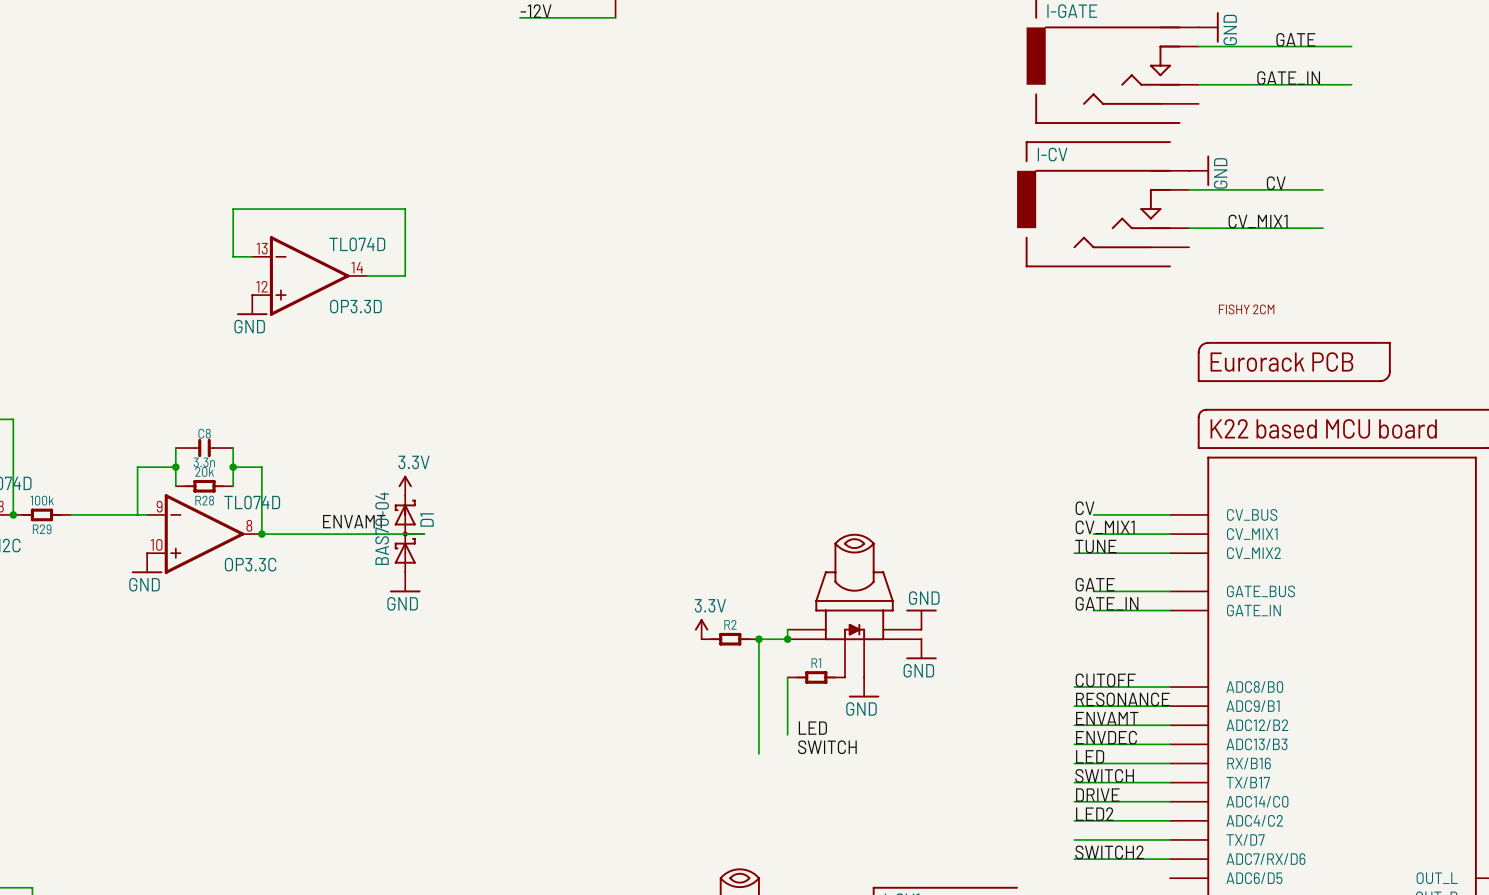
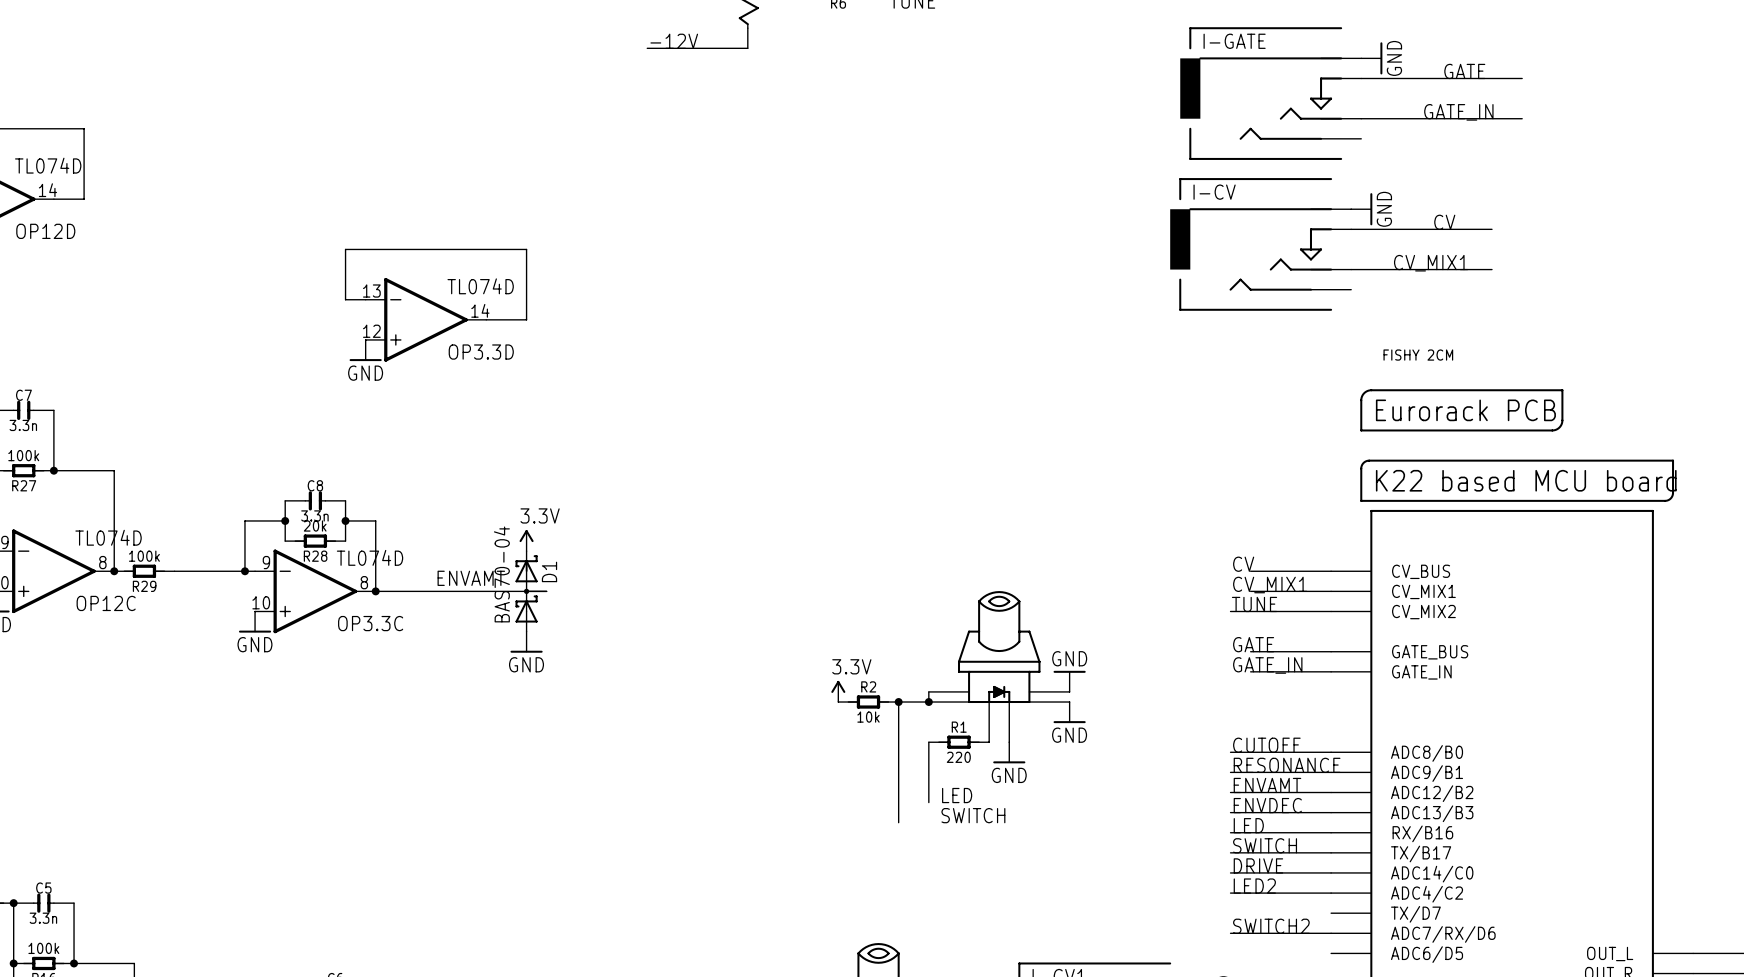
junction: none -> (244, 571)
R2 value: none -> 10k (868, 717)
R1 value: none -> 220 (958, 757)
wire: (1074, 839) (1170, 839) -> none

